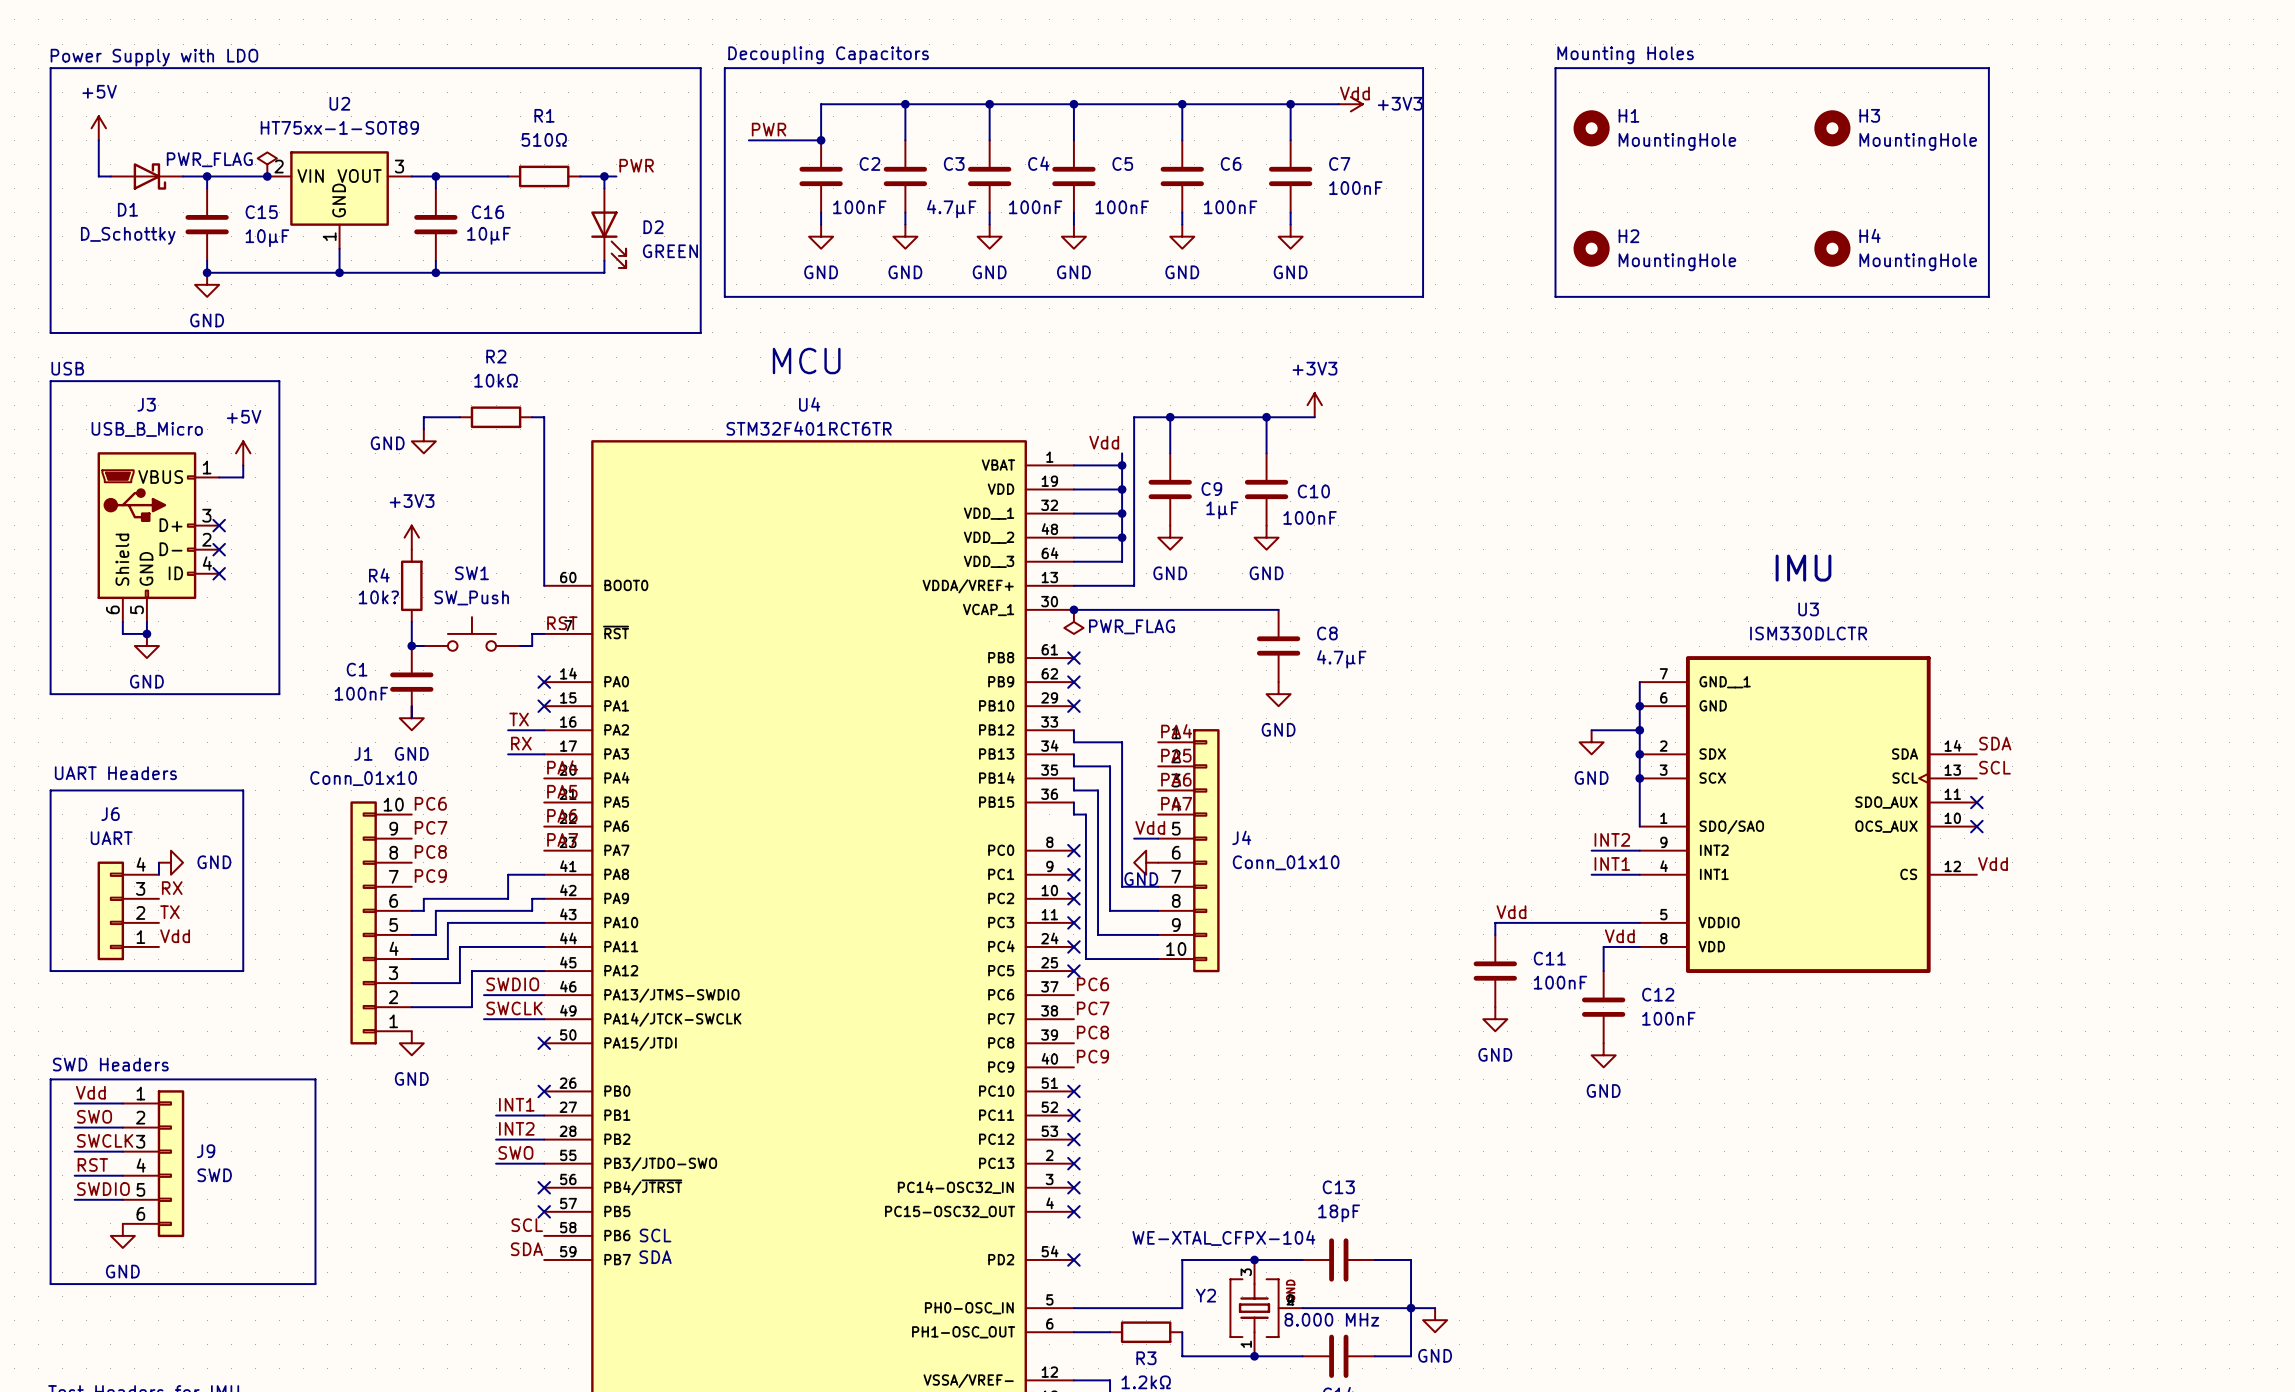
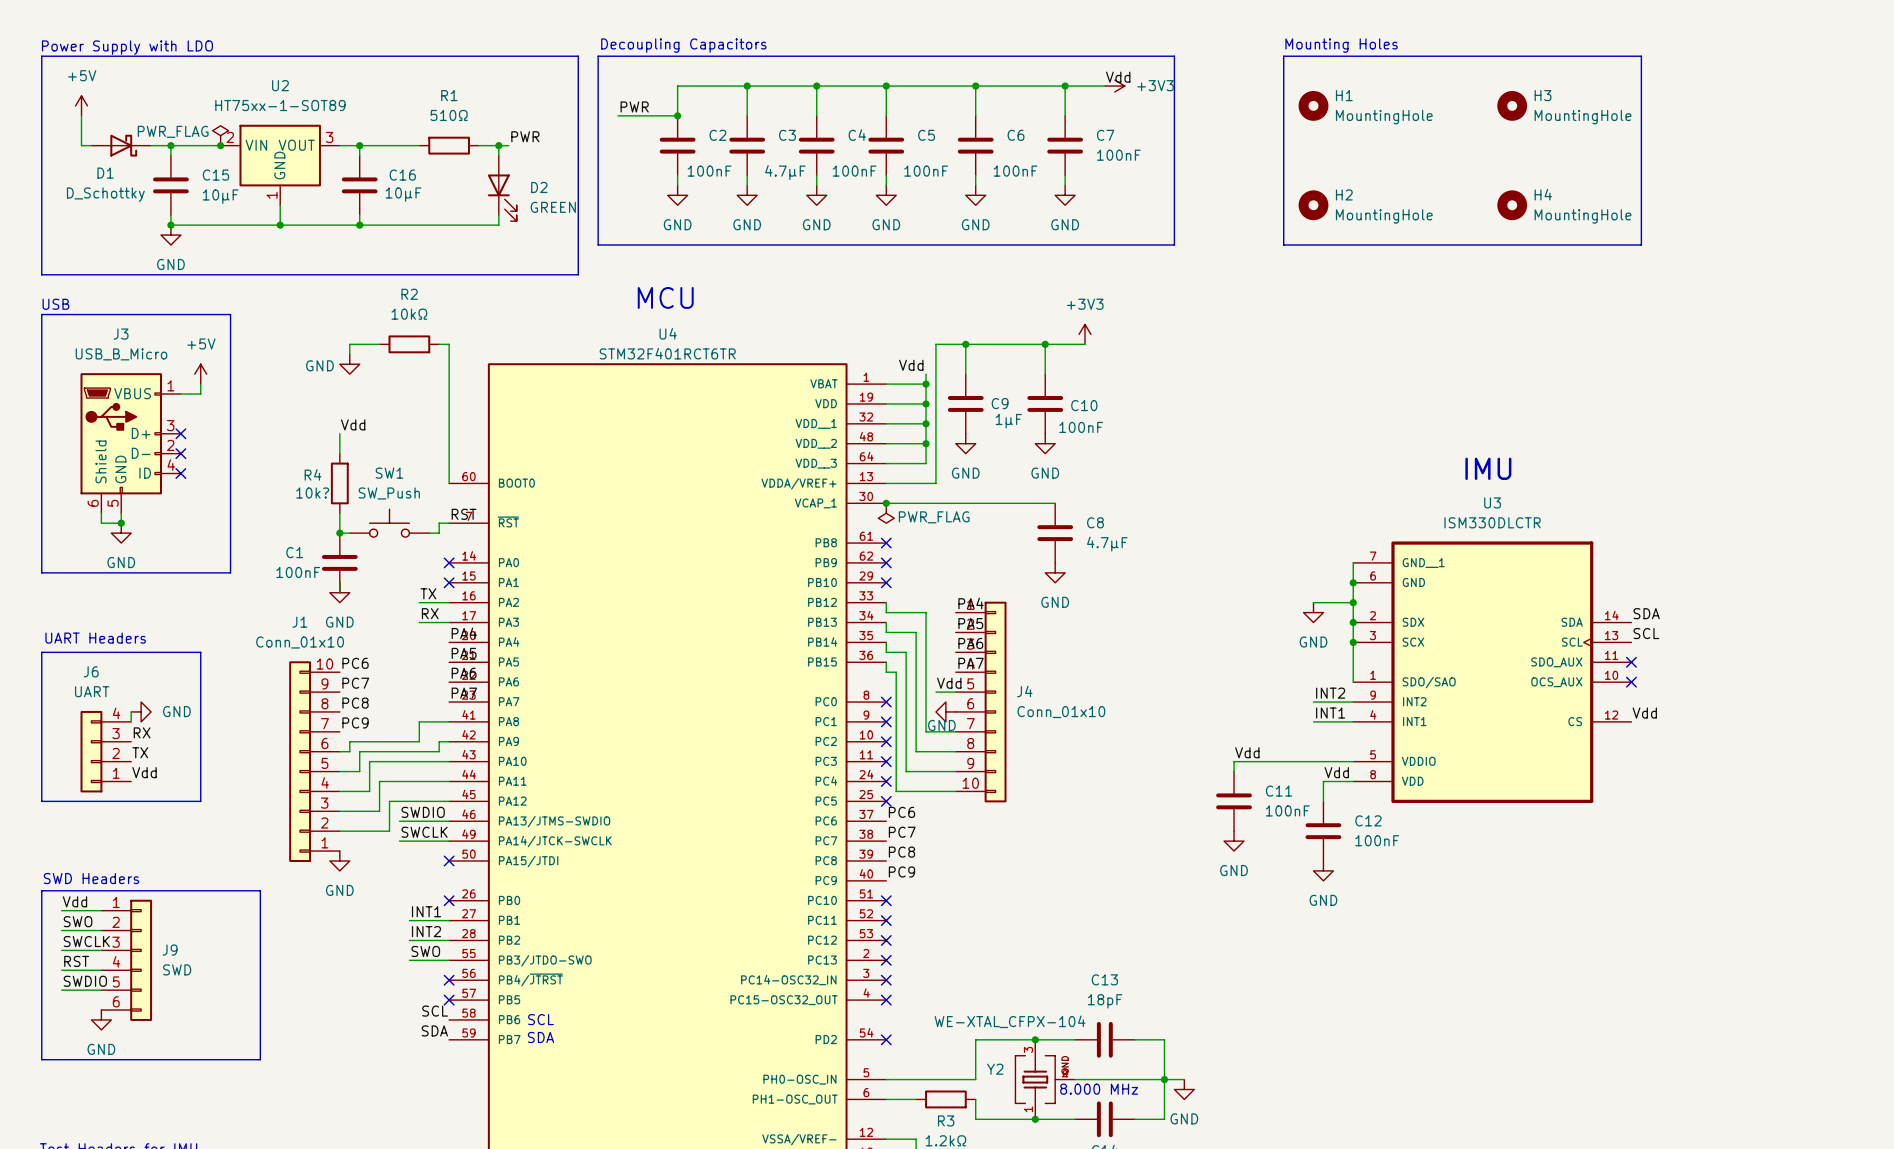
label: none -> Vdd (353, 424)
power symbol: +3V3 (411, 537) -> none

